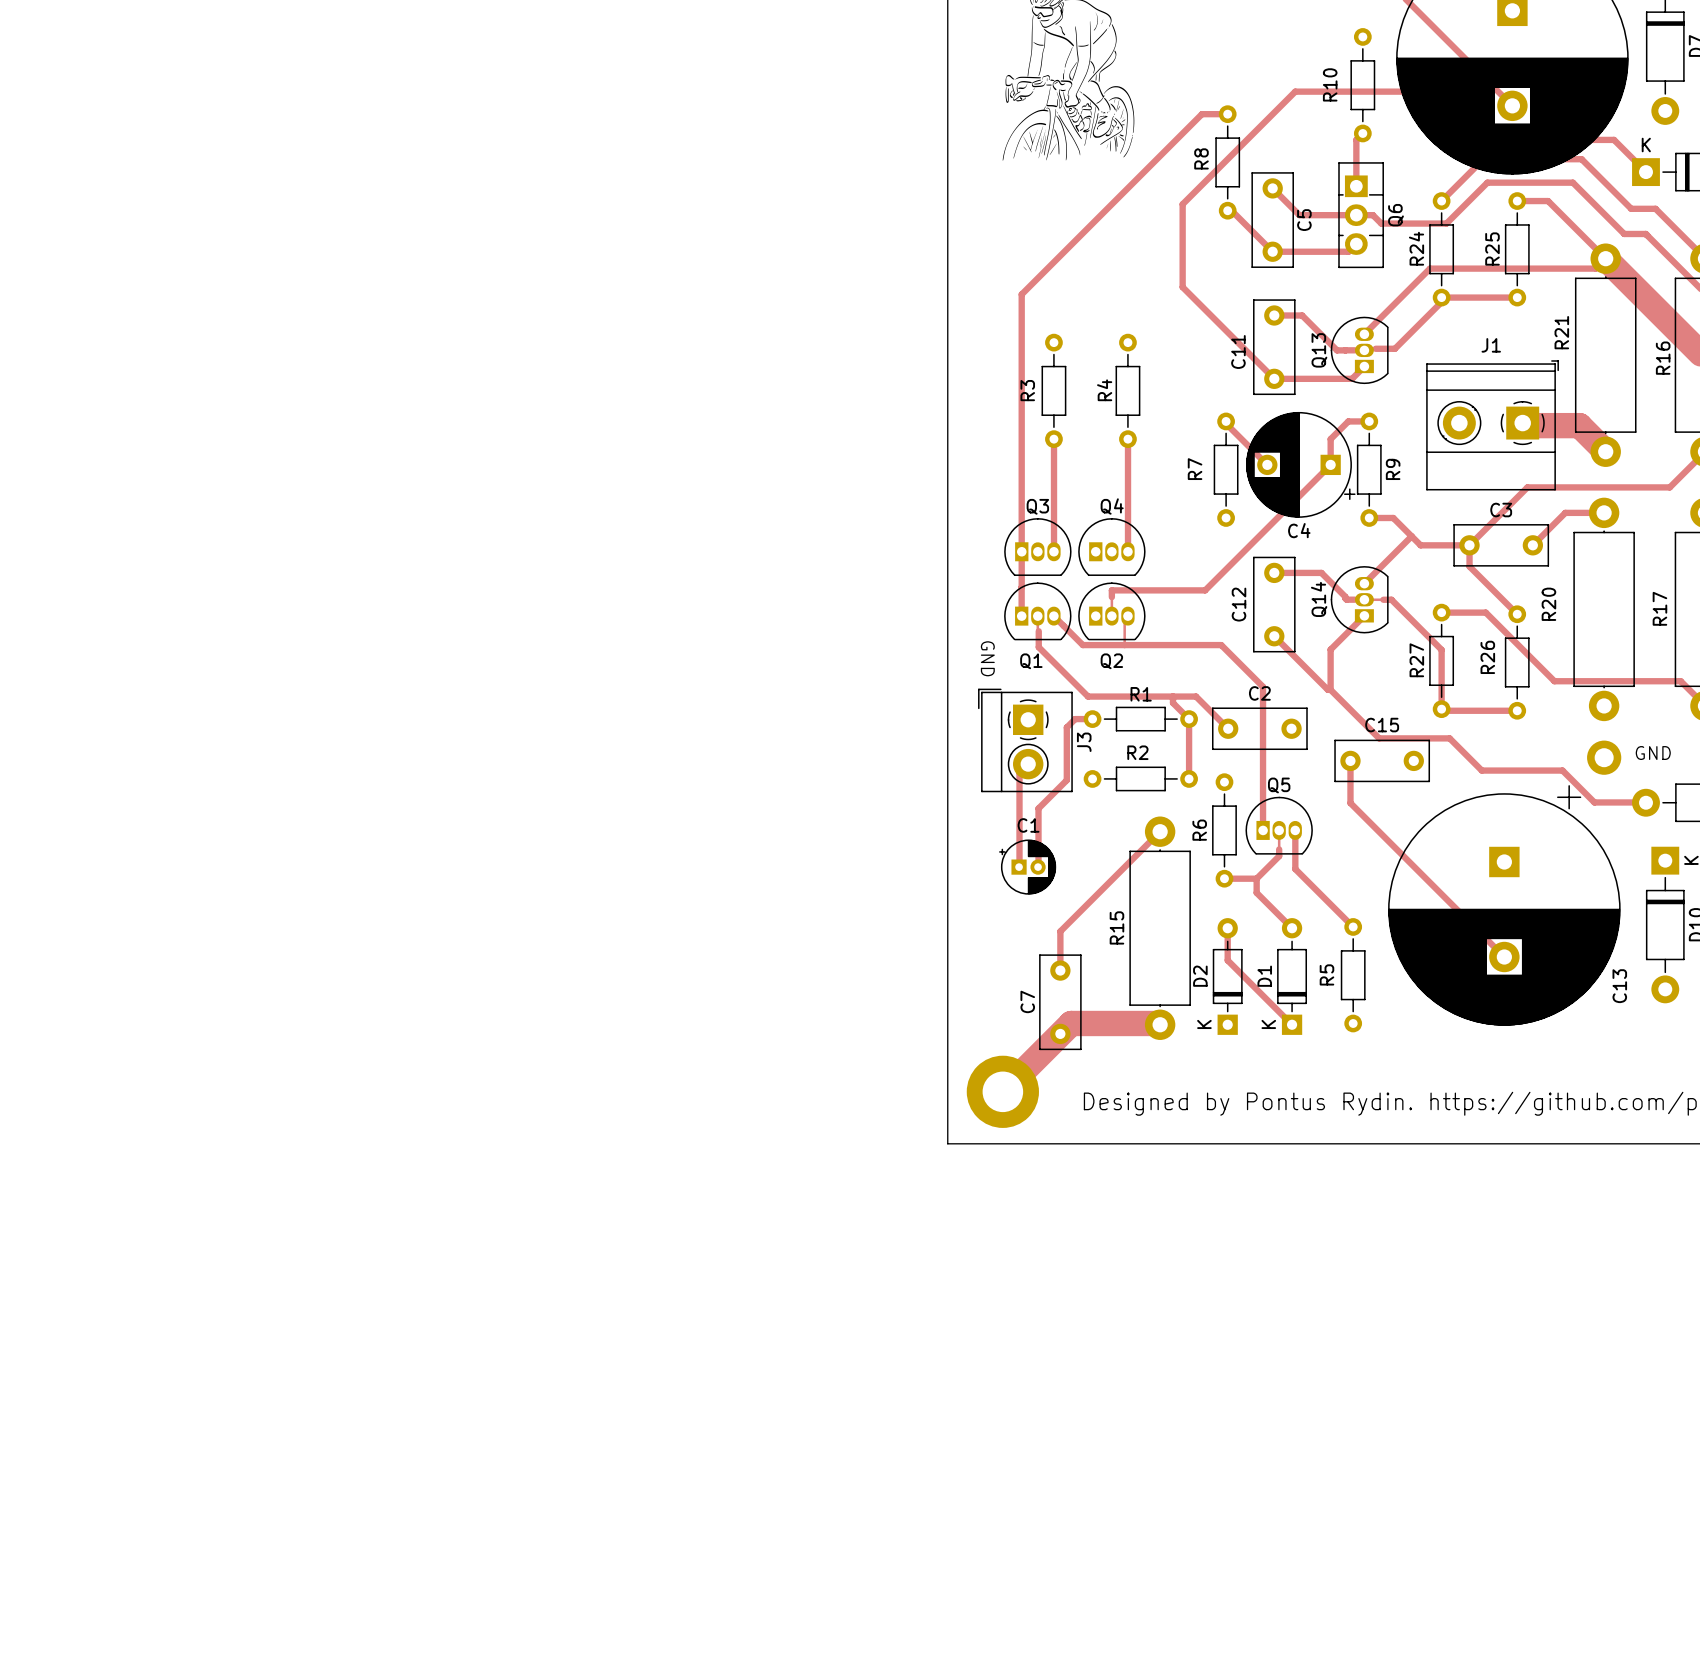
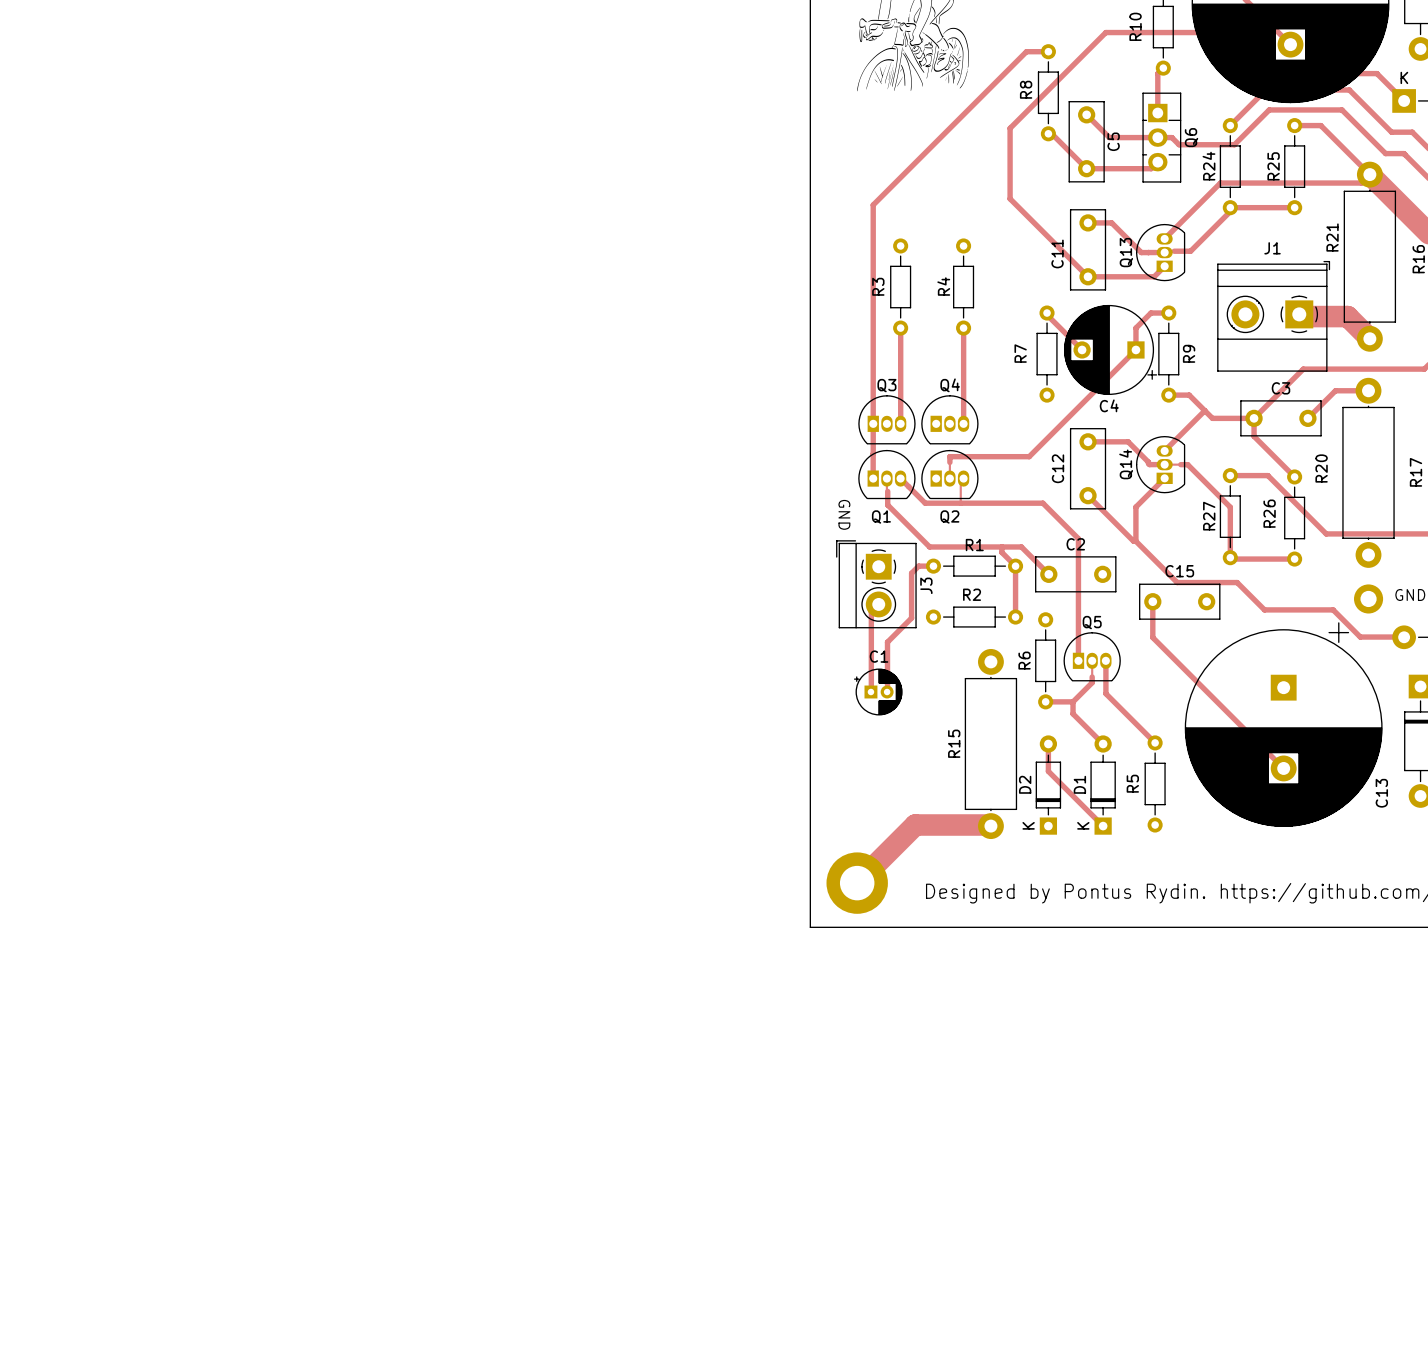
track: (1160, 831) (1060, 931) (1060, 970) -> none
C7: (1060, 1002) -> none

